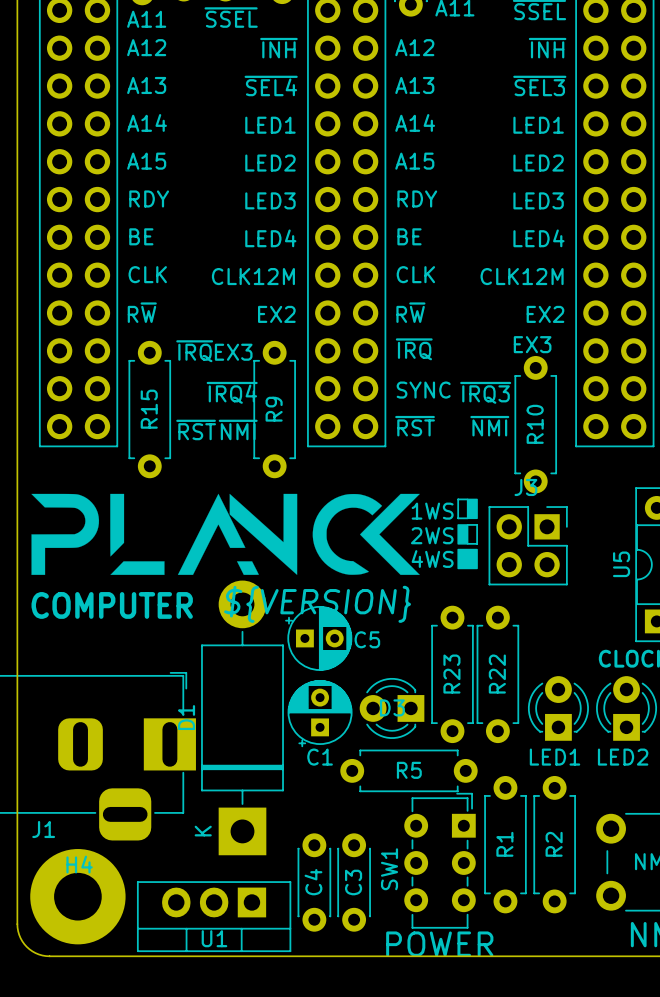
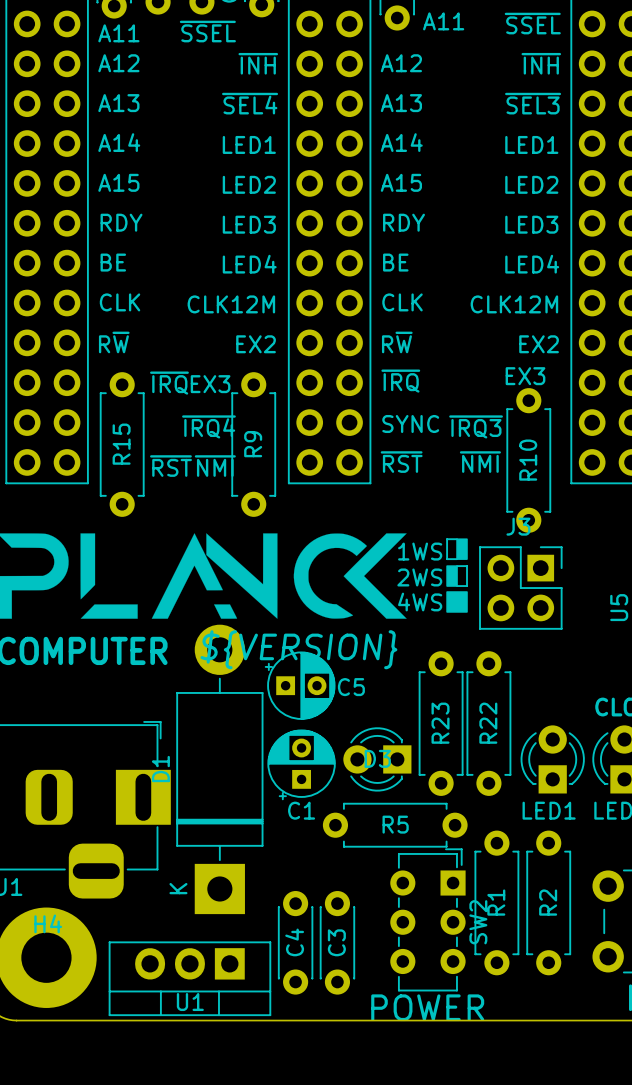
SW1 name: SW1 (389, 869) -> SW2 (478, 922)

